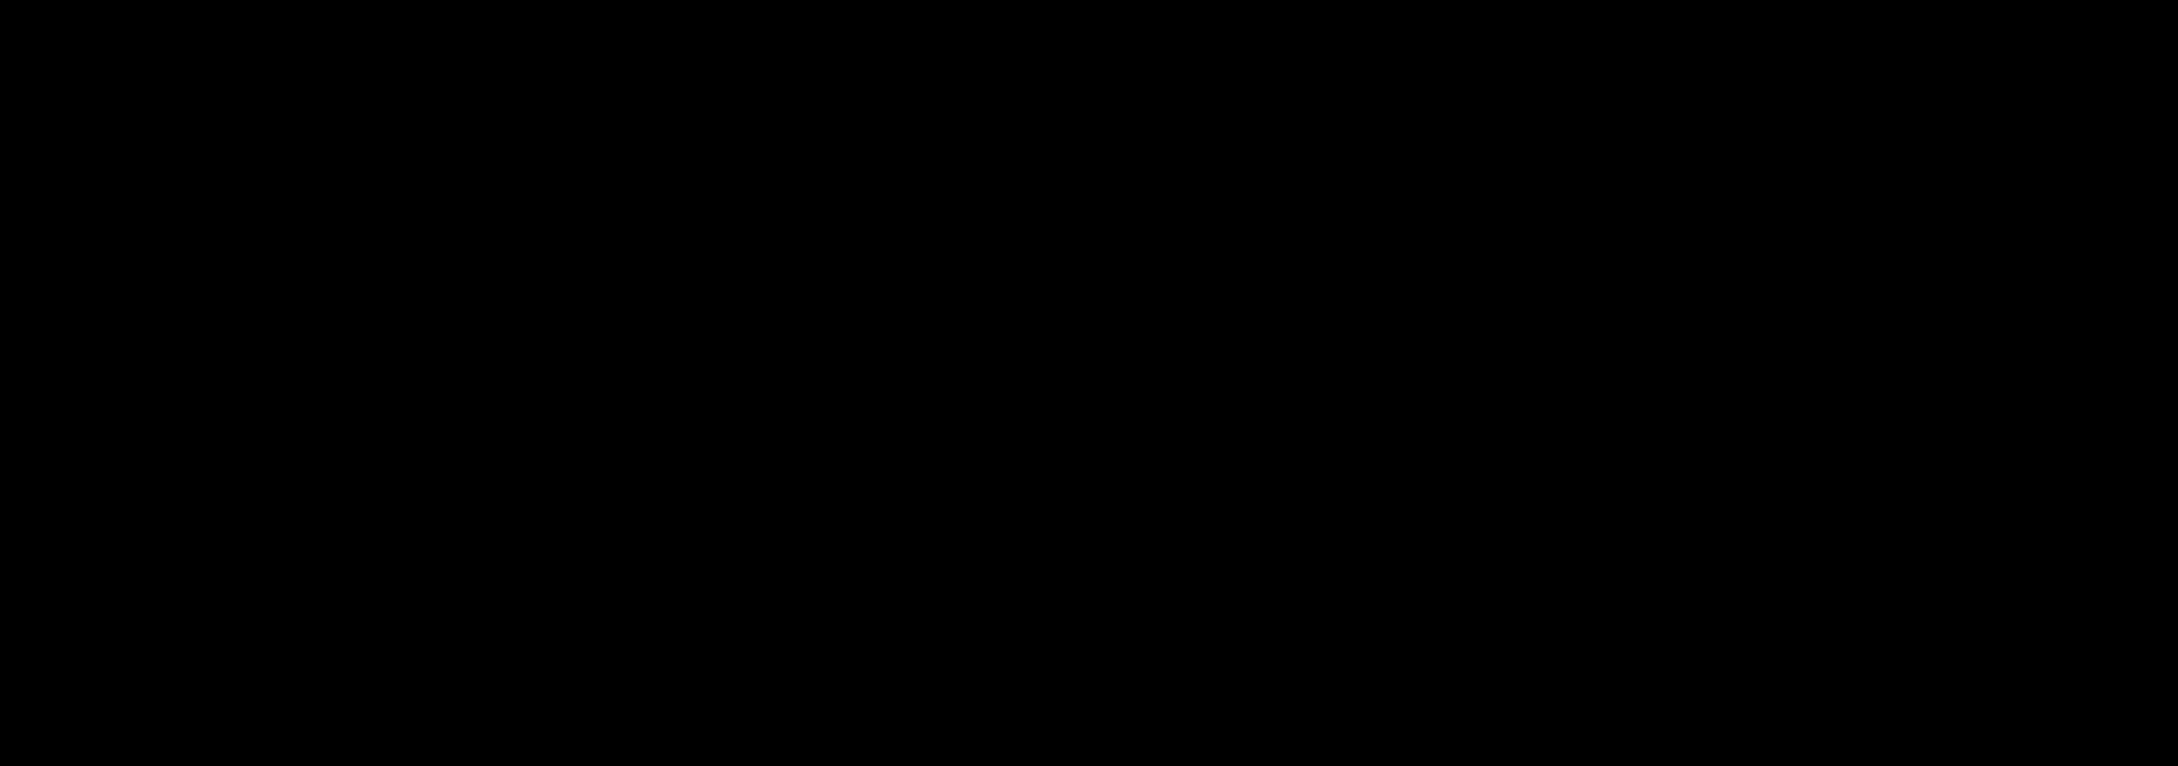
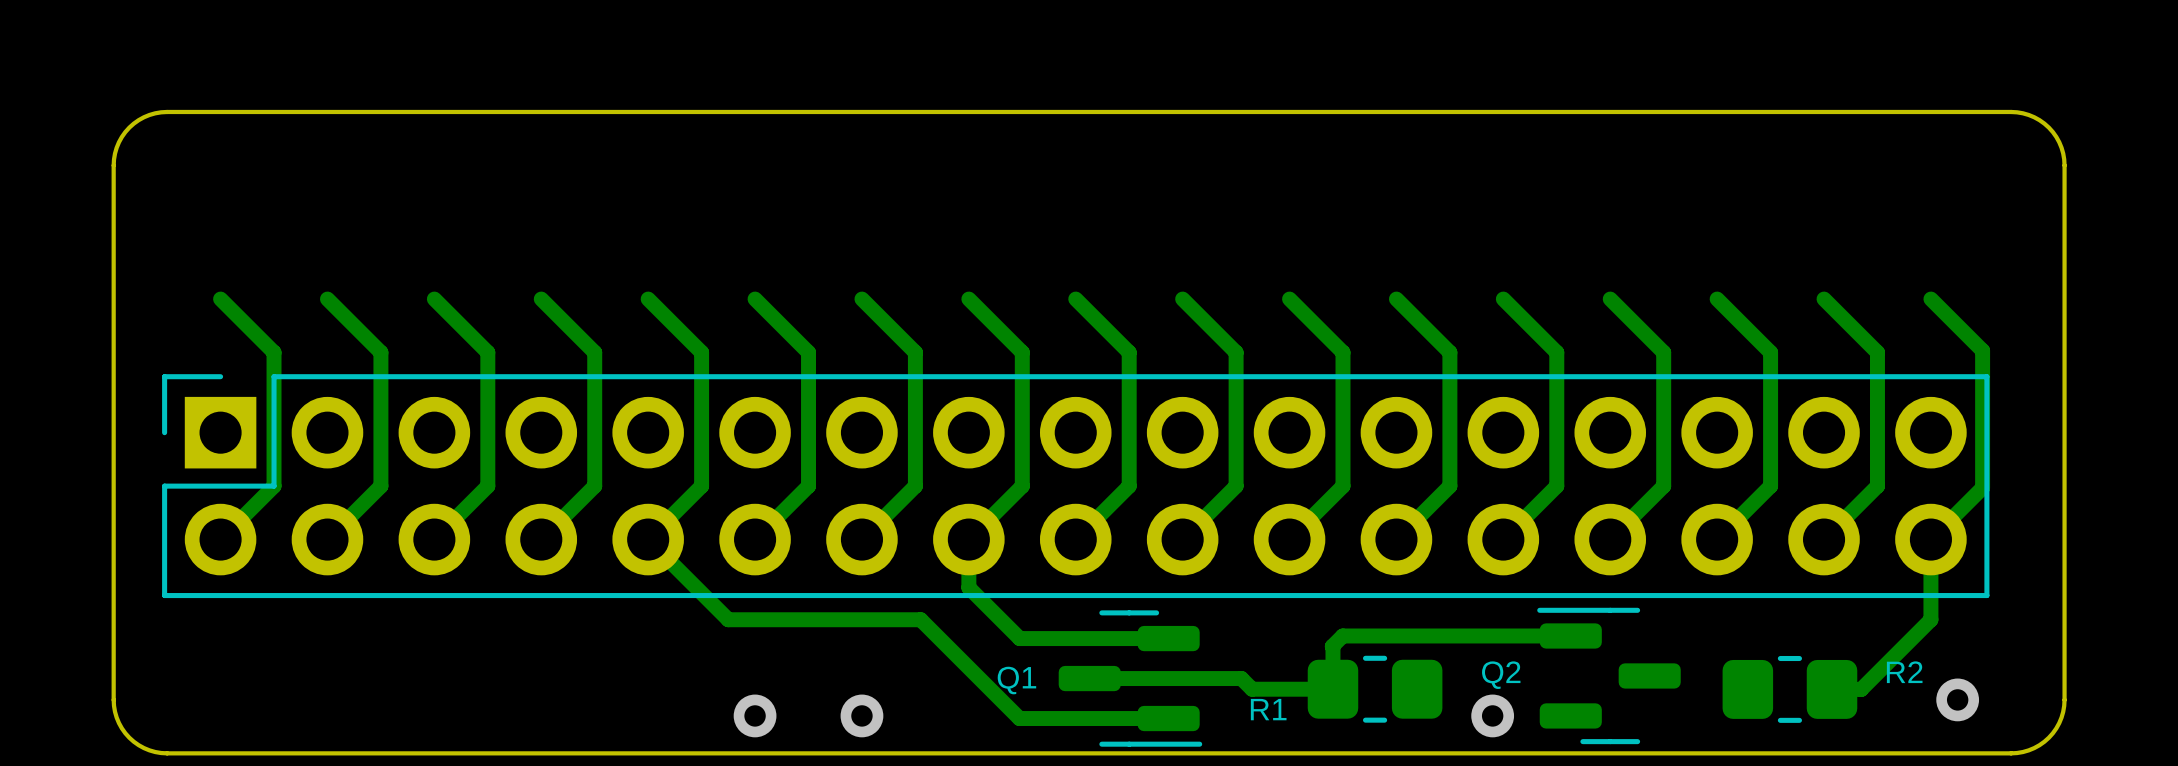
board edge: none -> (2011, 111) (167, 111) (149, 114) (133, 123) (121, 136) (115, 153) (113, 165) (113, 699) (116, 717) (121, 728) (133, 741) (149, 750) (167, 753) (2011, 753) (2028, 750) (2044, 741) (2052, 733) (2061, 717) (2064, 705) (2064, 165) (2059, 142) (2048, 127) (2034, 117) (2011, 111)
track: none -> (220, 299) (274, 352) (274, 486) (220, 539)
track: none -> (327, 299) (380, 352) (380, 486) (327, 539)
track: none -> (434, 299) (487, 352) (487, 486) (434, 539)
track: none -> (541, 299) (594, 352) (594, 486) (541, 539)
track: none -> (648, 299) (701, 352) (701, 486) (648, 539) (728, 619) (920, 619) (1019, 718) (1168, 718)
track: none -> (755, 299) (808, 352) (808, 486) (755, 539)
track: none -> (861, 299) (915, 352) (915, 486) (861, 539)
track: none -> (968, 299) (1022, 352) (1022, 486) (968, 539) (968, 587) (1019, 638) (1168, 638)
track: none -> (1075, 299) (1129, 352) (1129, 486) (1075, 539)
track: none -> (1182, 299) (1236, 352) (1236, 486) (1182, 539)
track: none -> (1289, 299) (1343, 352) (1343, 486) (1289, 539)
track: none -> (1396, 299) (1449, 352) (1449, 486) (1396, 539)
track: none -> (1503, 299) (1556, 352) (1556, 486) (1503, 539)
track: none -> (1610, 299) (1663, 352) (1663, 486) (1610, 539)
track: none -> (1717, 299) (1770, 352) (1770, 486) (1717, 539)
track: none -> (1824, 299) (1877, 352) (1877, 486) (1824, 539)
track: none -> (1930, 299) (1982, 350) (1982, 487) (1930, 539) (1930, 619) (1861, 689) (1832, 689)
part: none -> (1075, 486)
track: none -> (1570, 635) (1342, 635) (1332, 646) (1332, 689) (1252, 689) (1241, 678) (1089, 678)
Q2: none -> (1608, 675)
Q1: none -> (1130, 678)
R1: none -> (1375, 689)
R2: none -> (1789, 689)
via: none -> (1957, 699)
via: none -> (755, 715)
via: none -> (861, 715)
via: none -> (1492, 715)

